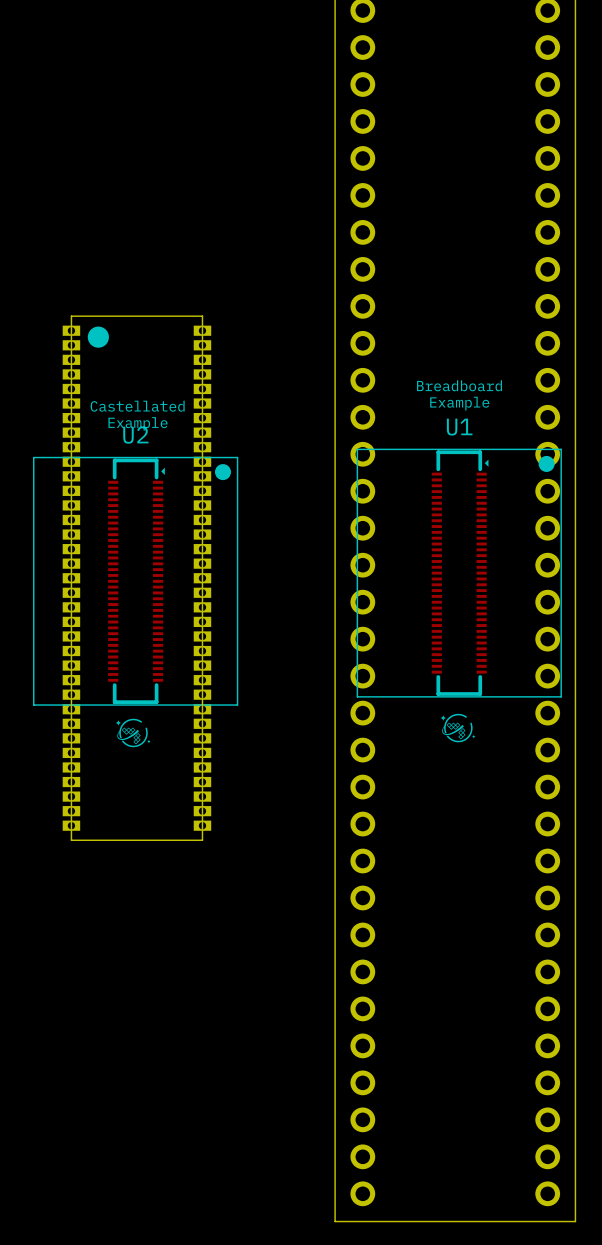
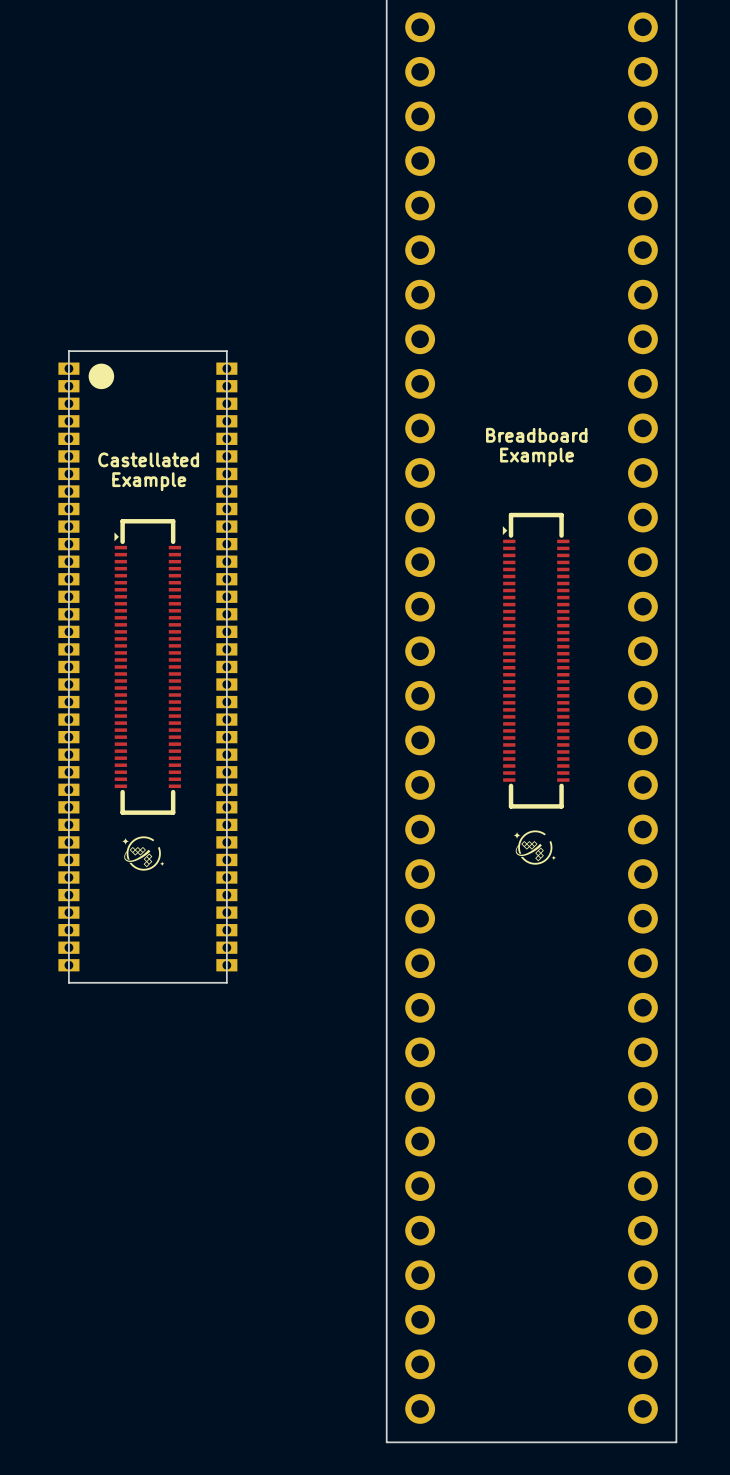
U1: (459, 573) -> none
part: none -> (536, 660)
part: none -> (147, 666)
U2: (135, 581) -> none

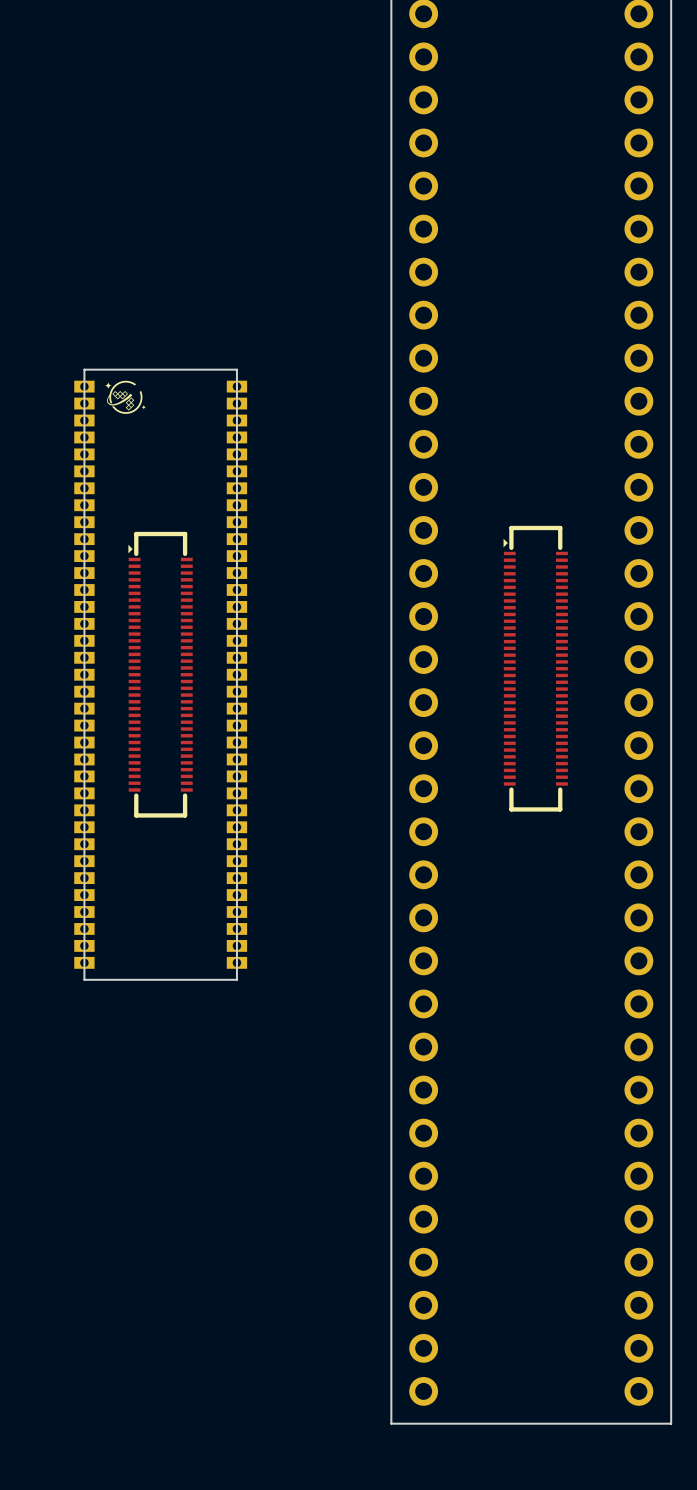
drawing shape: [88, 363, 115, 390] -> [104, 380, 147, 414]
text: Breadboard (536, 435) -> none
text: Example (537, 457) -> none
text: Castellated (148, 459) -> none
text: Example (149, 481) -> none
drawing: [513, 830, 557, 865] -> none
drawing: [121, 836, 165, 871] -> none

